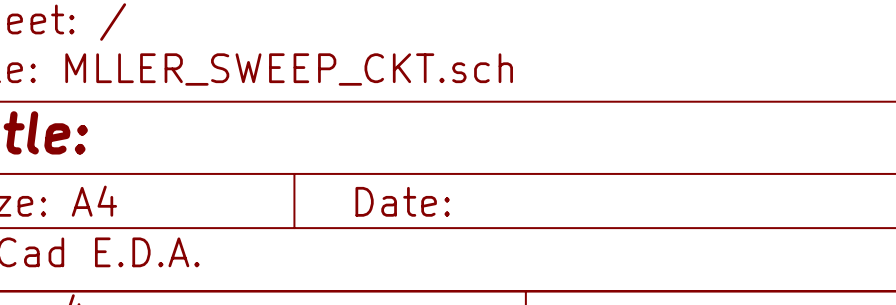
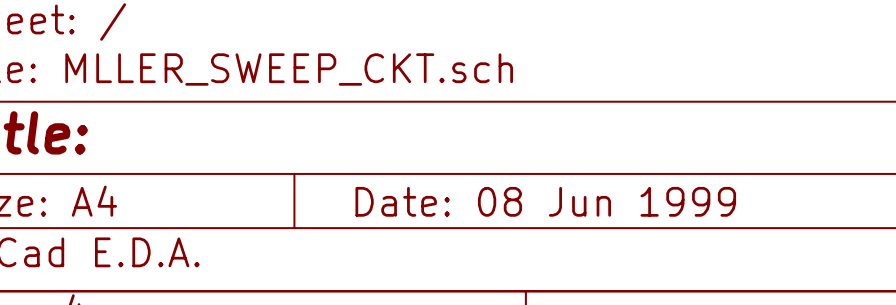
title block: Date: (402, 201) -> Date: 08 Jun 1999 (545, 201)

